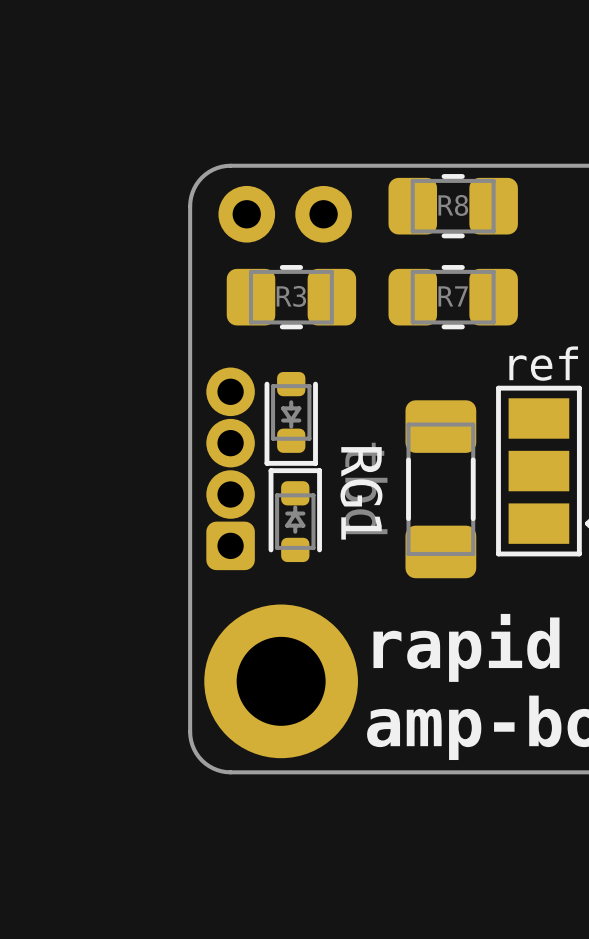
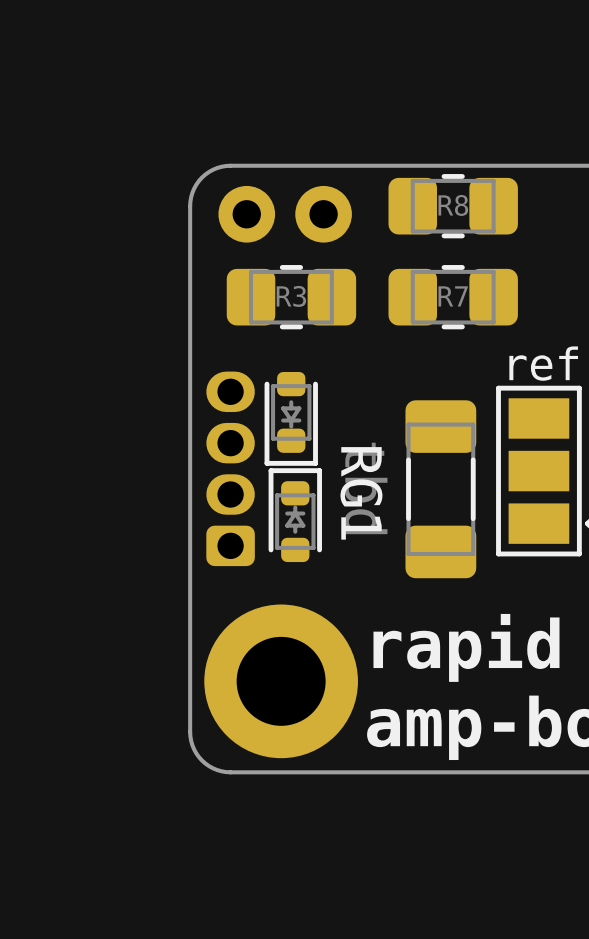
part footprint: [206, 367, 255, 571] -> [206, 371, 255, 567]

